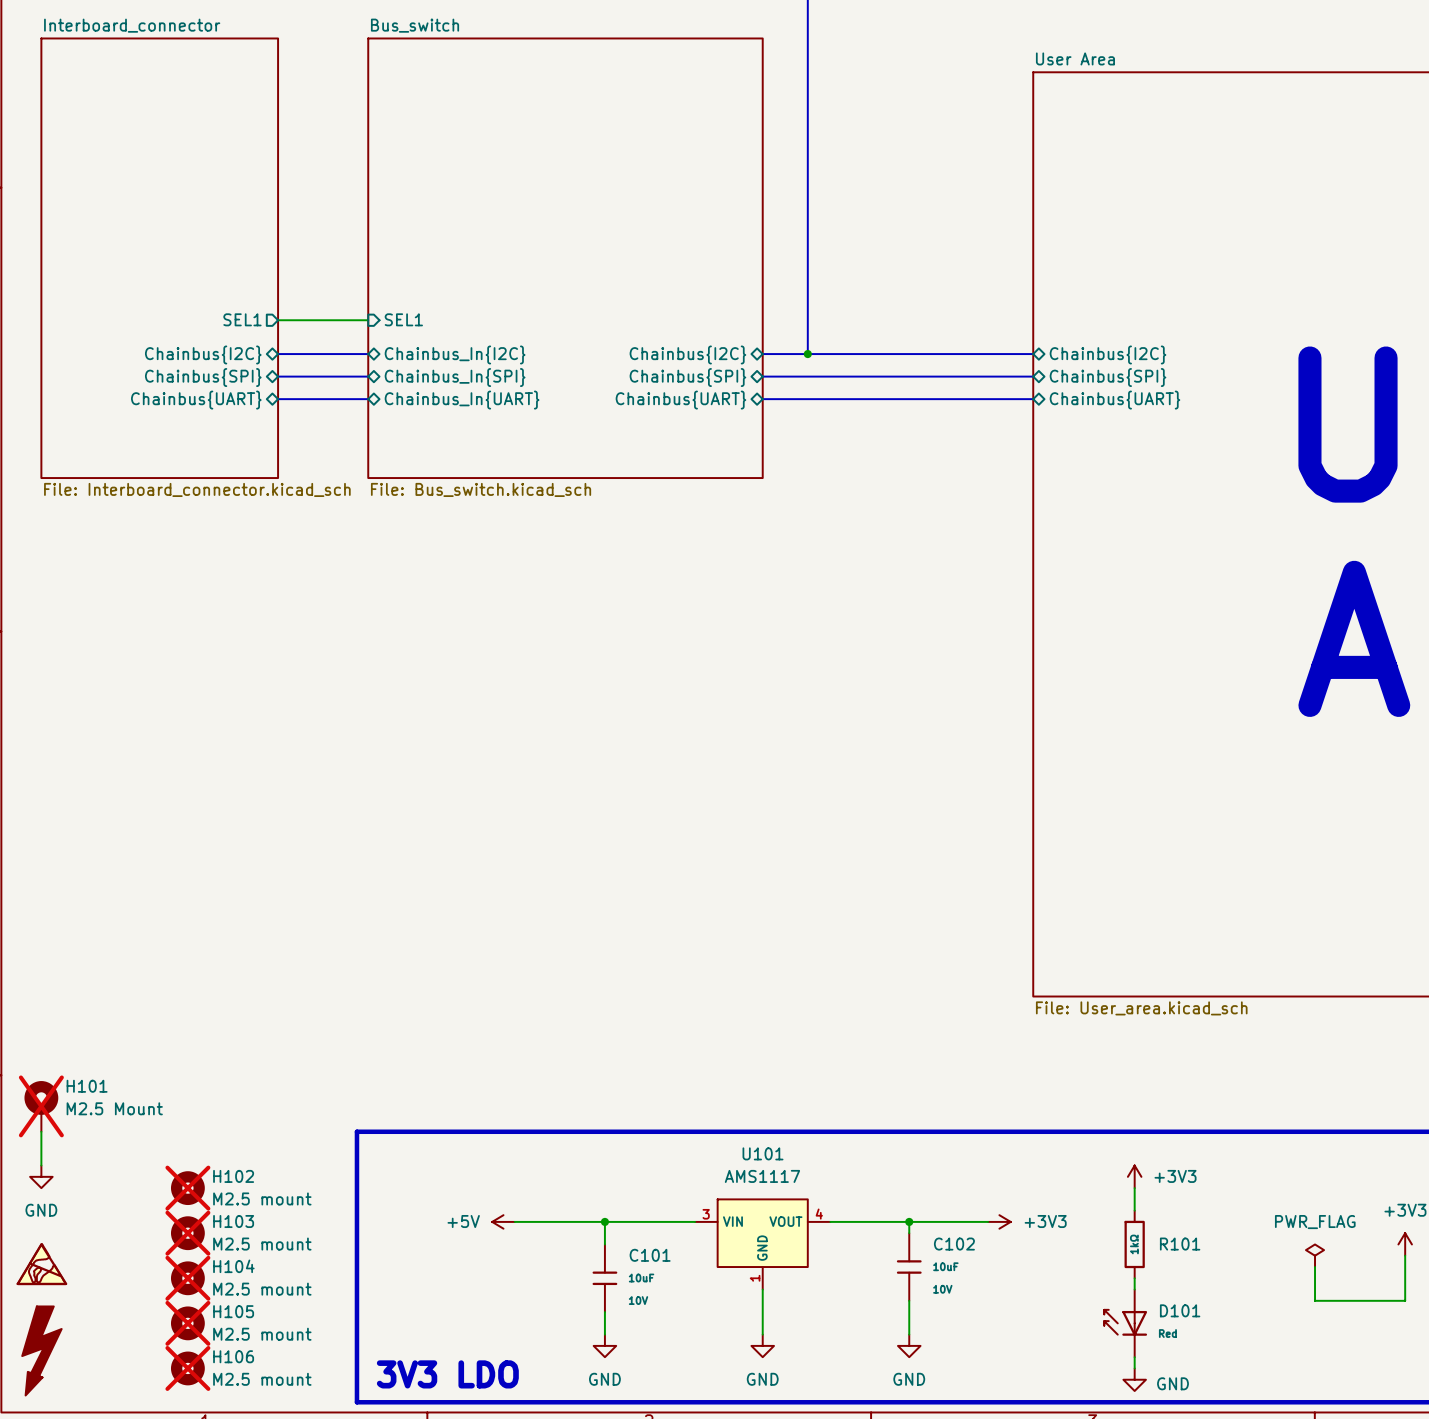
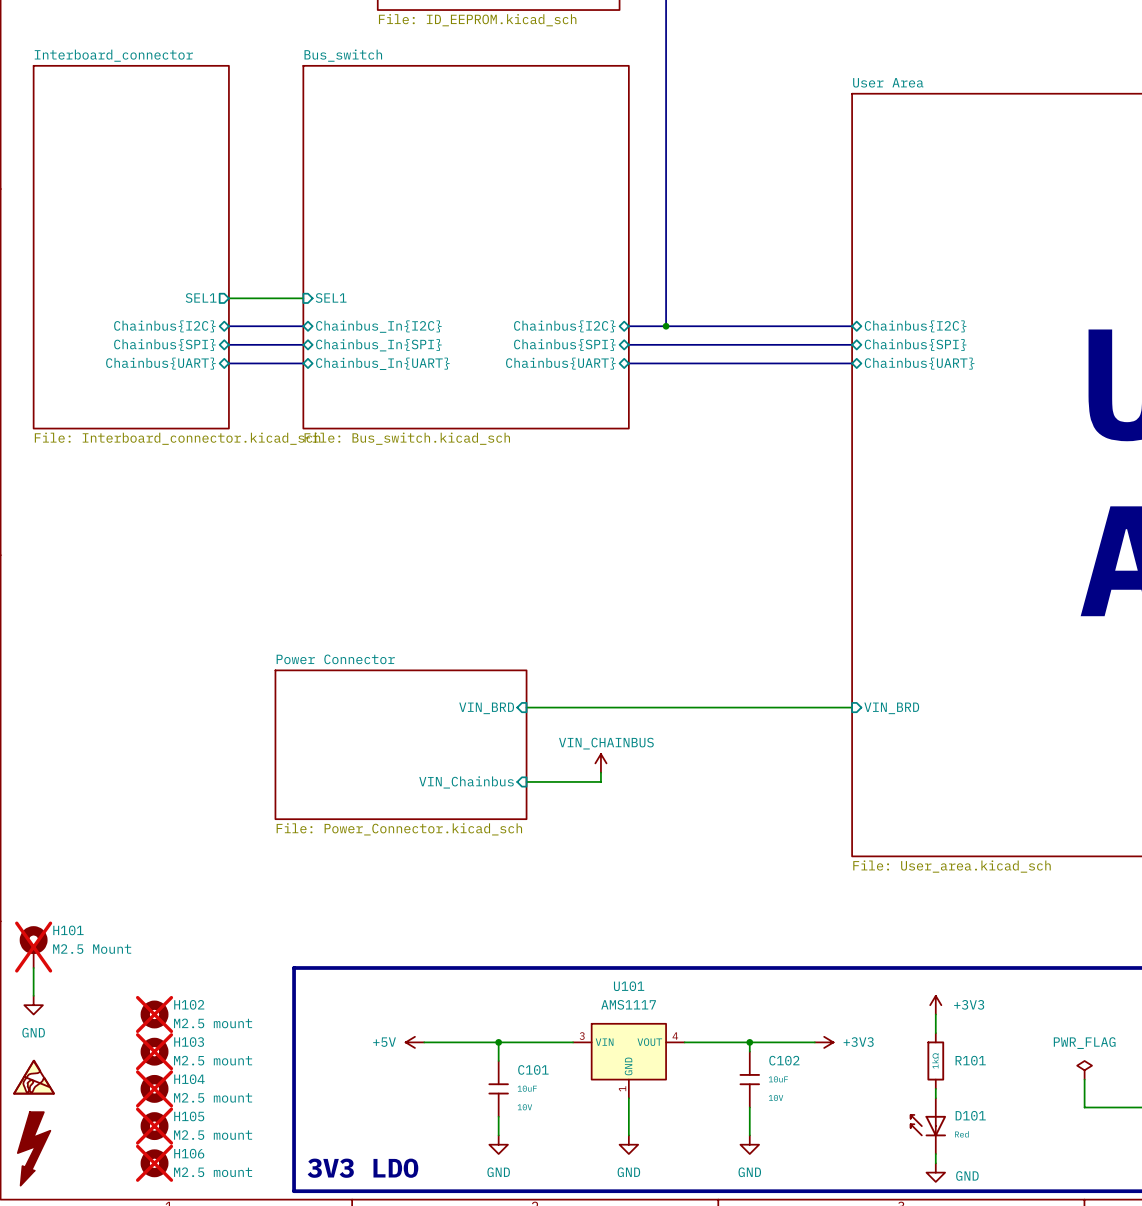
sheet pin: none -> VIN_BRD (486, 708)
wire: none -> (526, 707) (852, 707)
sheet pin: none -> VIN_BRD (891, 708)
sheet Power Connector: none -> File: Power_Connector.kicad_sch (401, 744)
power symbol: none -> VIN_CHAINBUS (600, 763)
wire: none -> (600, 772) (600, 781) (526, 781)
sheet pin: none -> VIN_Chainbus (466, 782)

